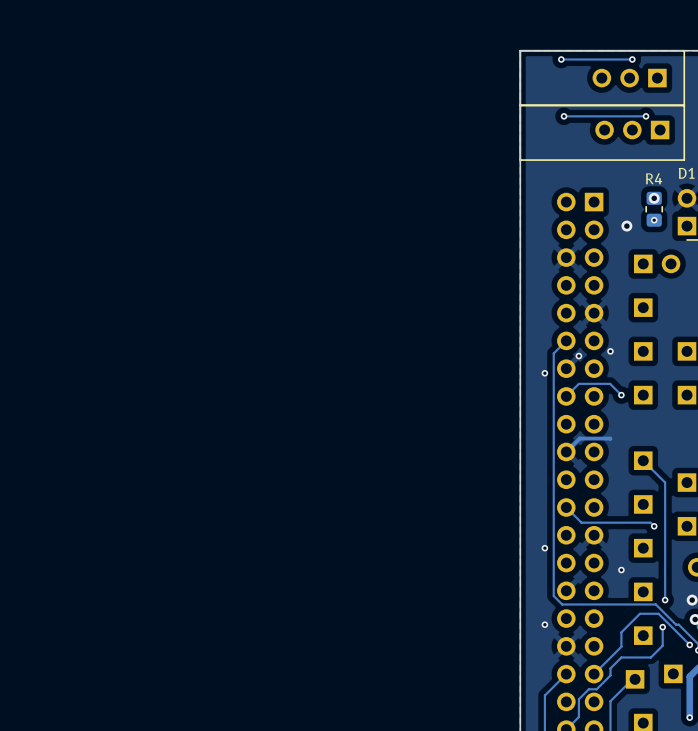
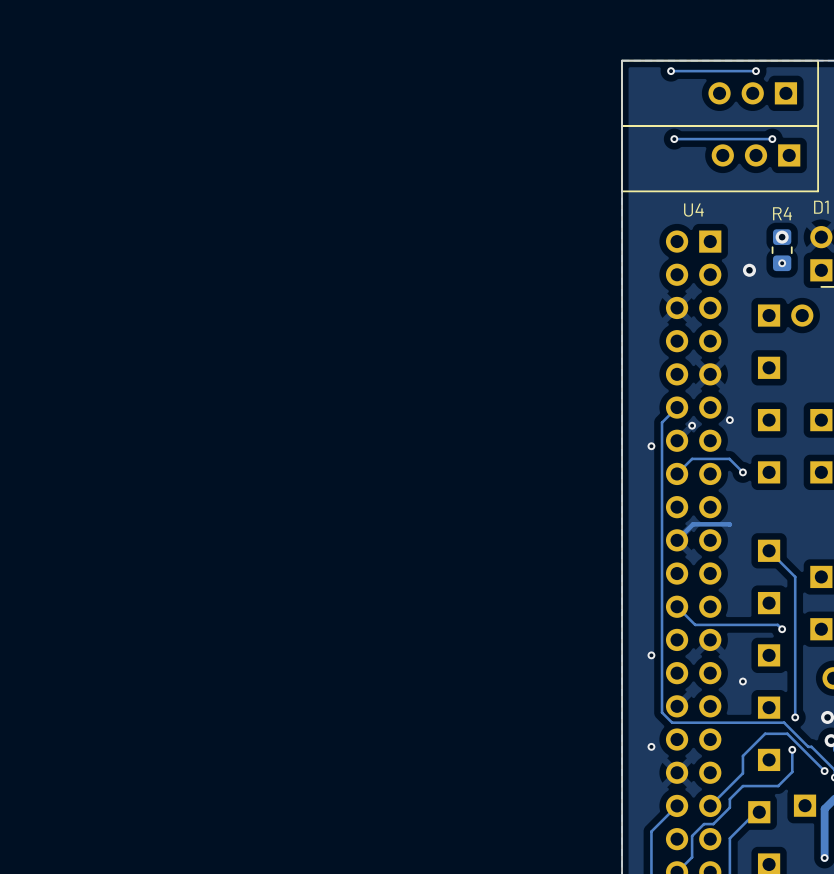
U4 name: none -> U4 (693, 210)

